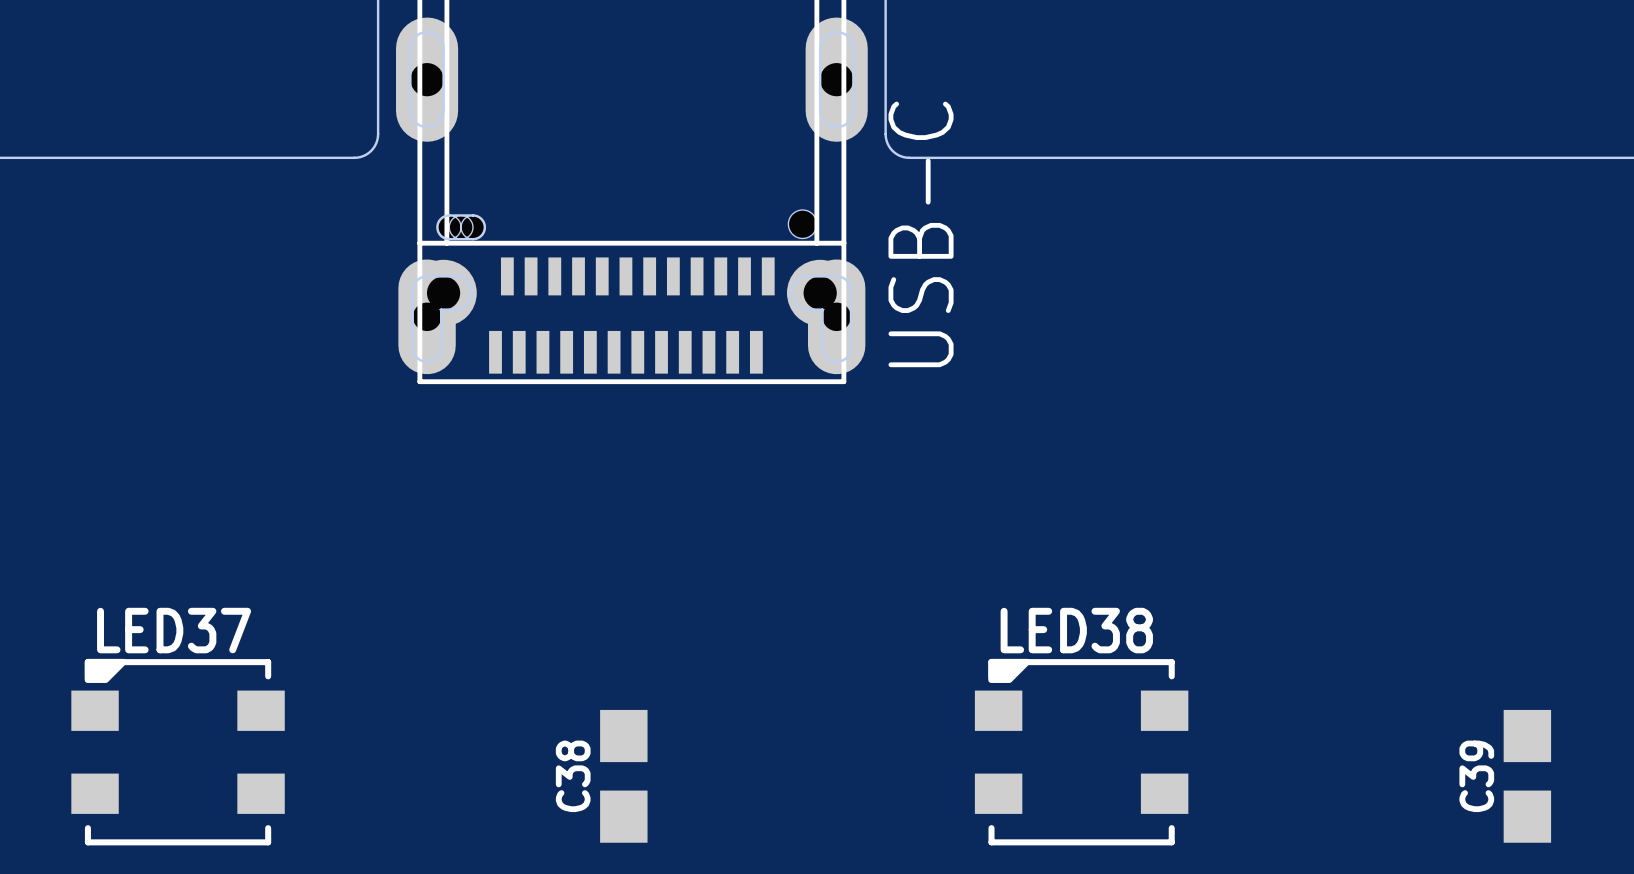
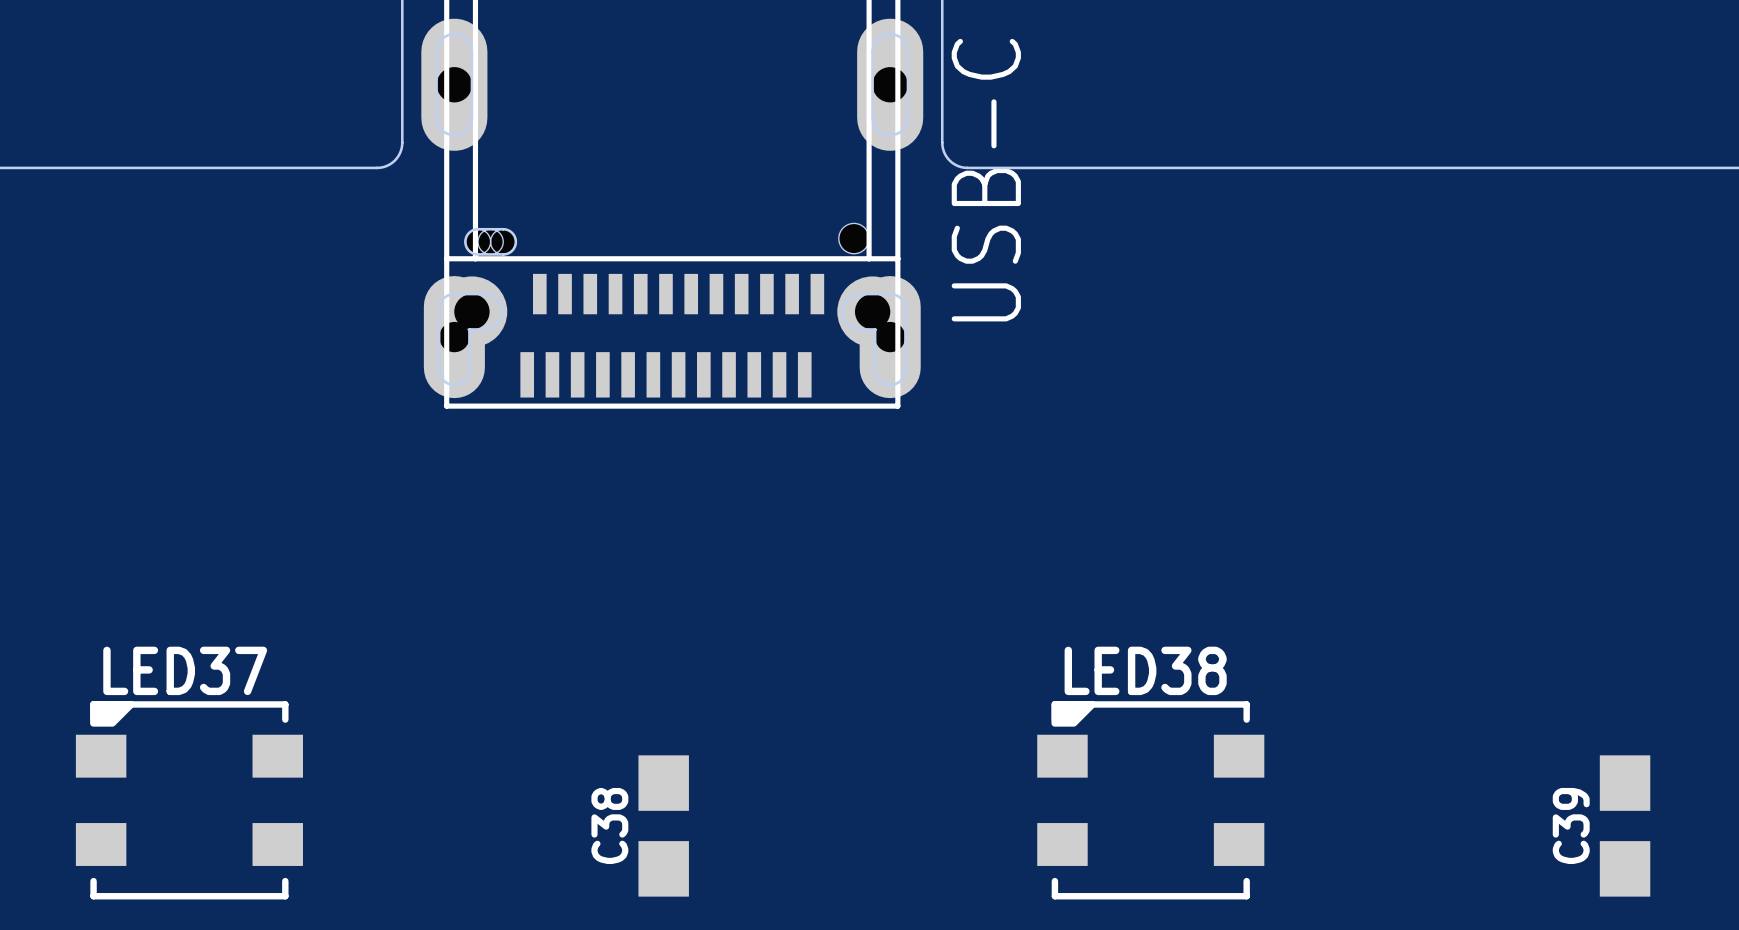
USB-C name position: USB-C (921, 234) -> USB-C (986, 180)

